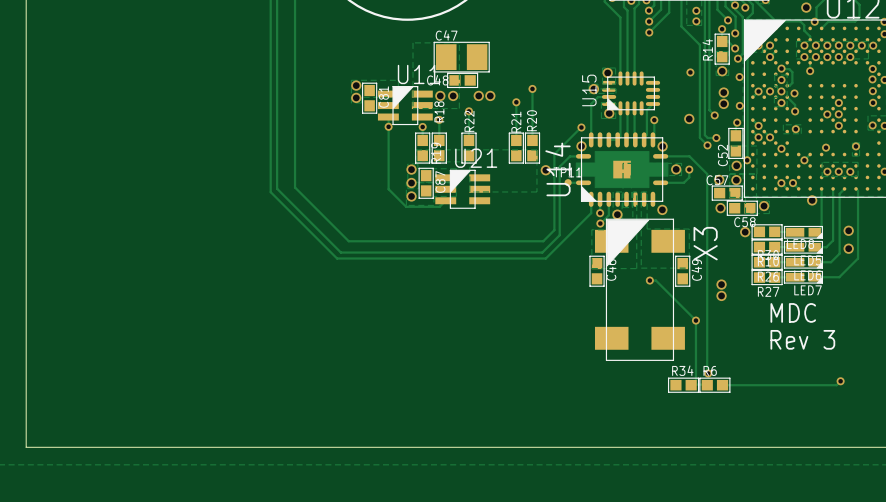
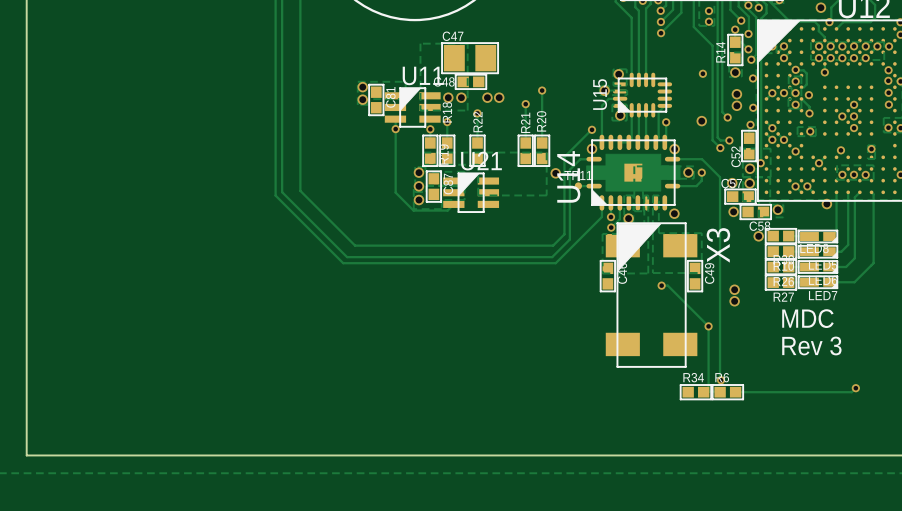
via: (848, 230) -> none
via: (848, 248) -> none

